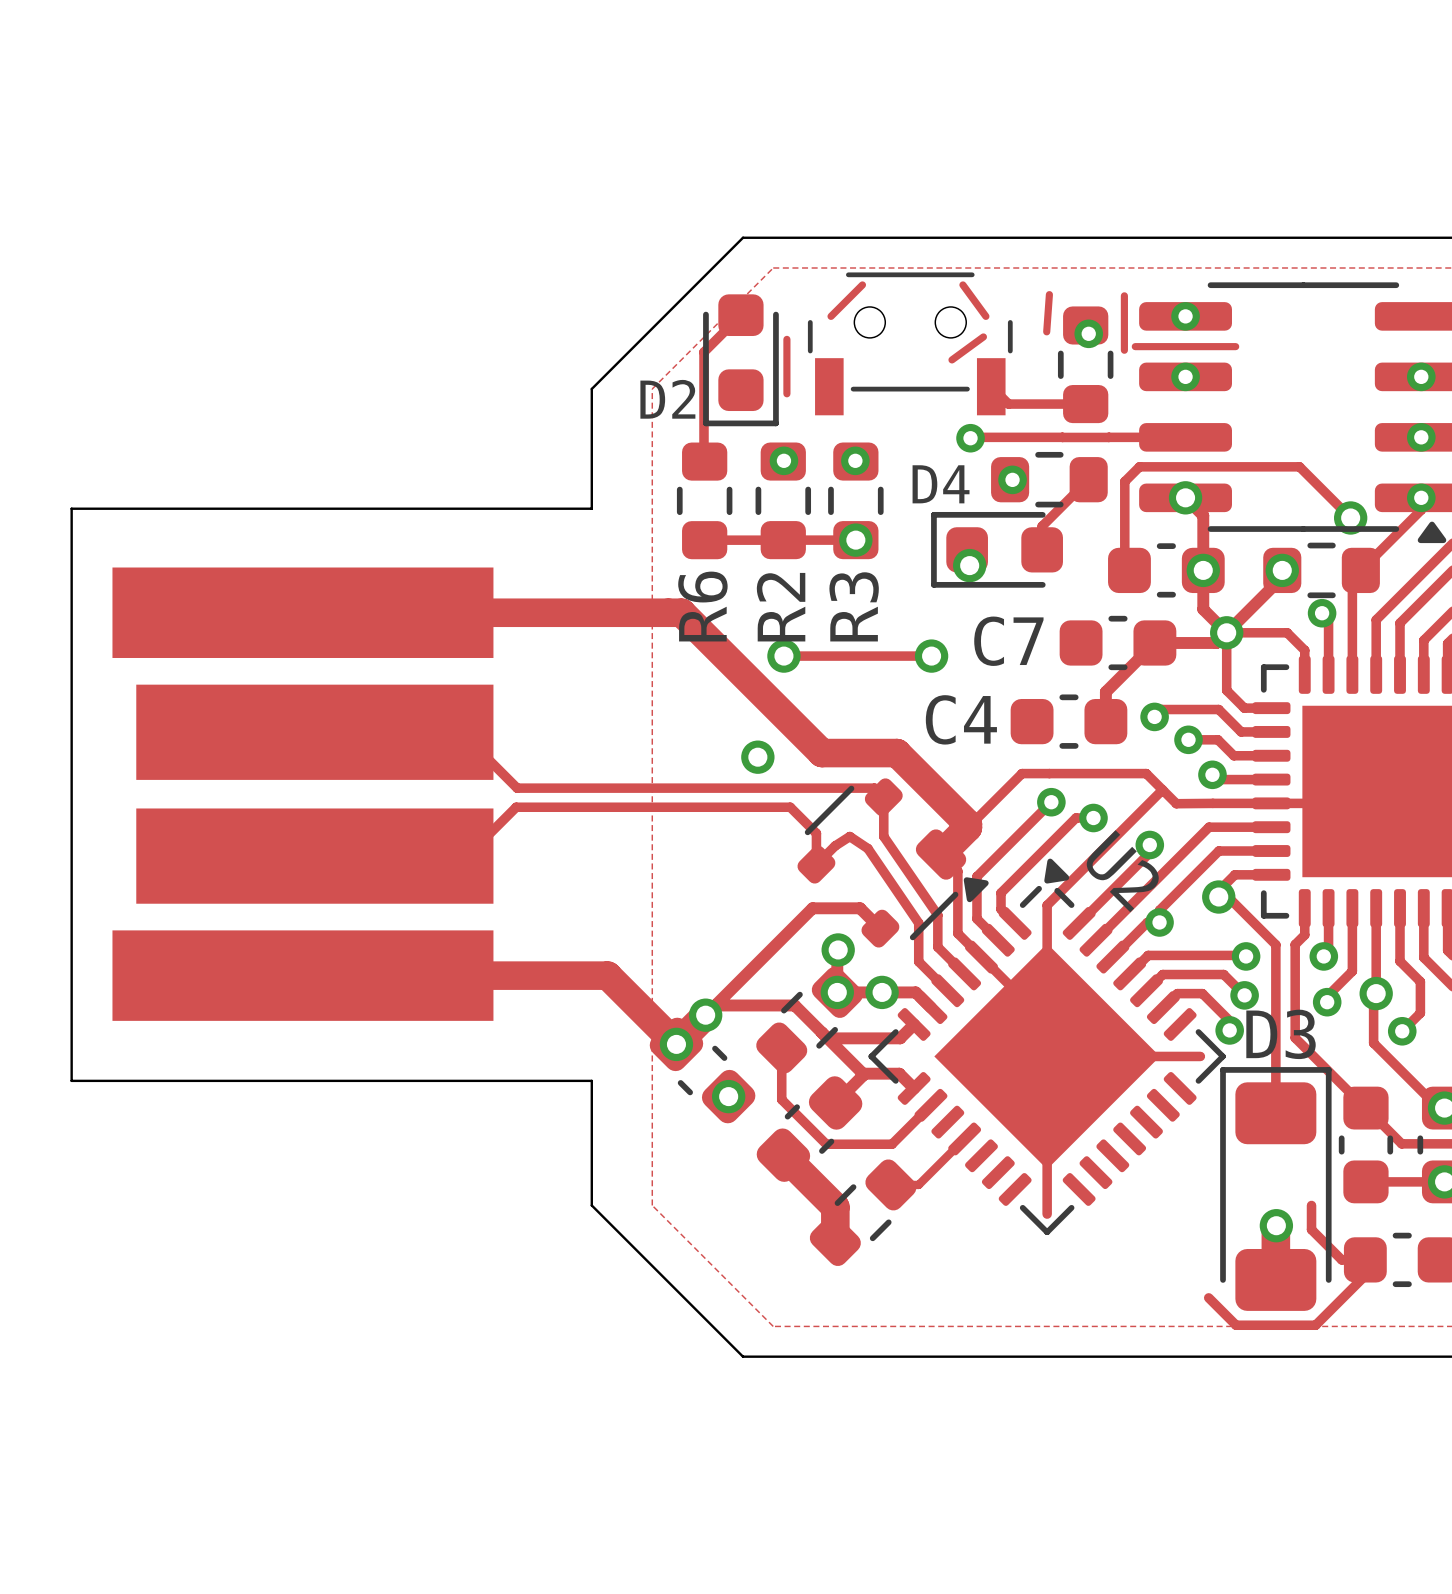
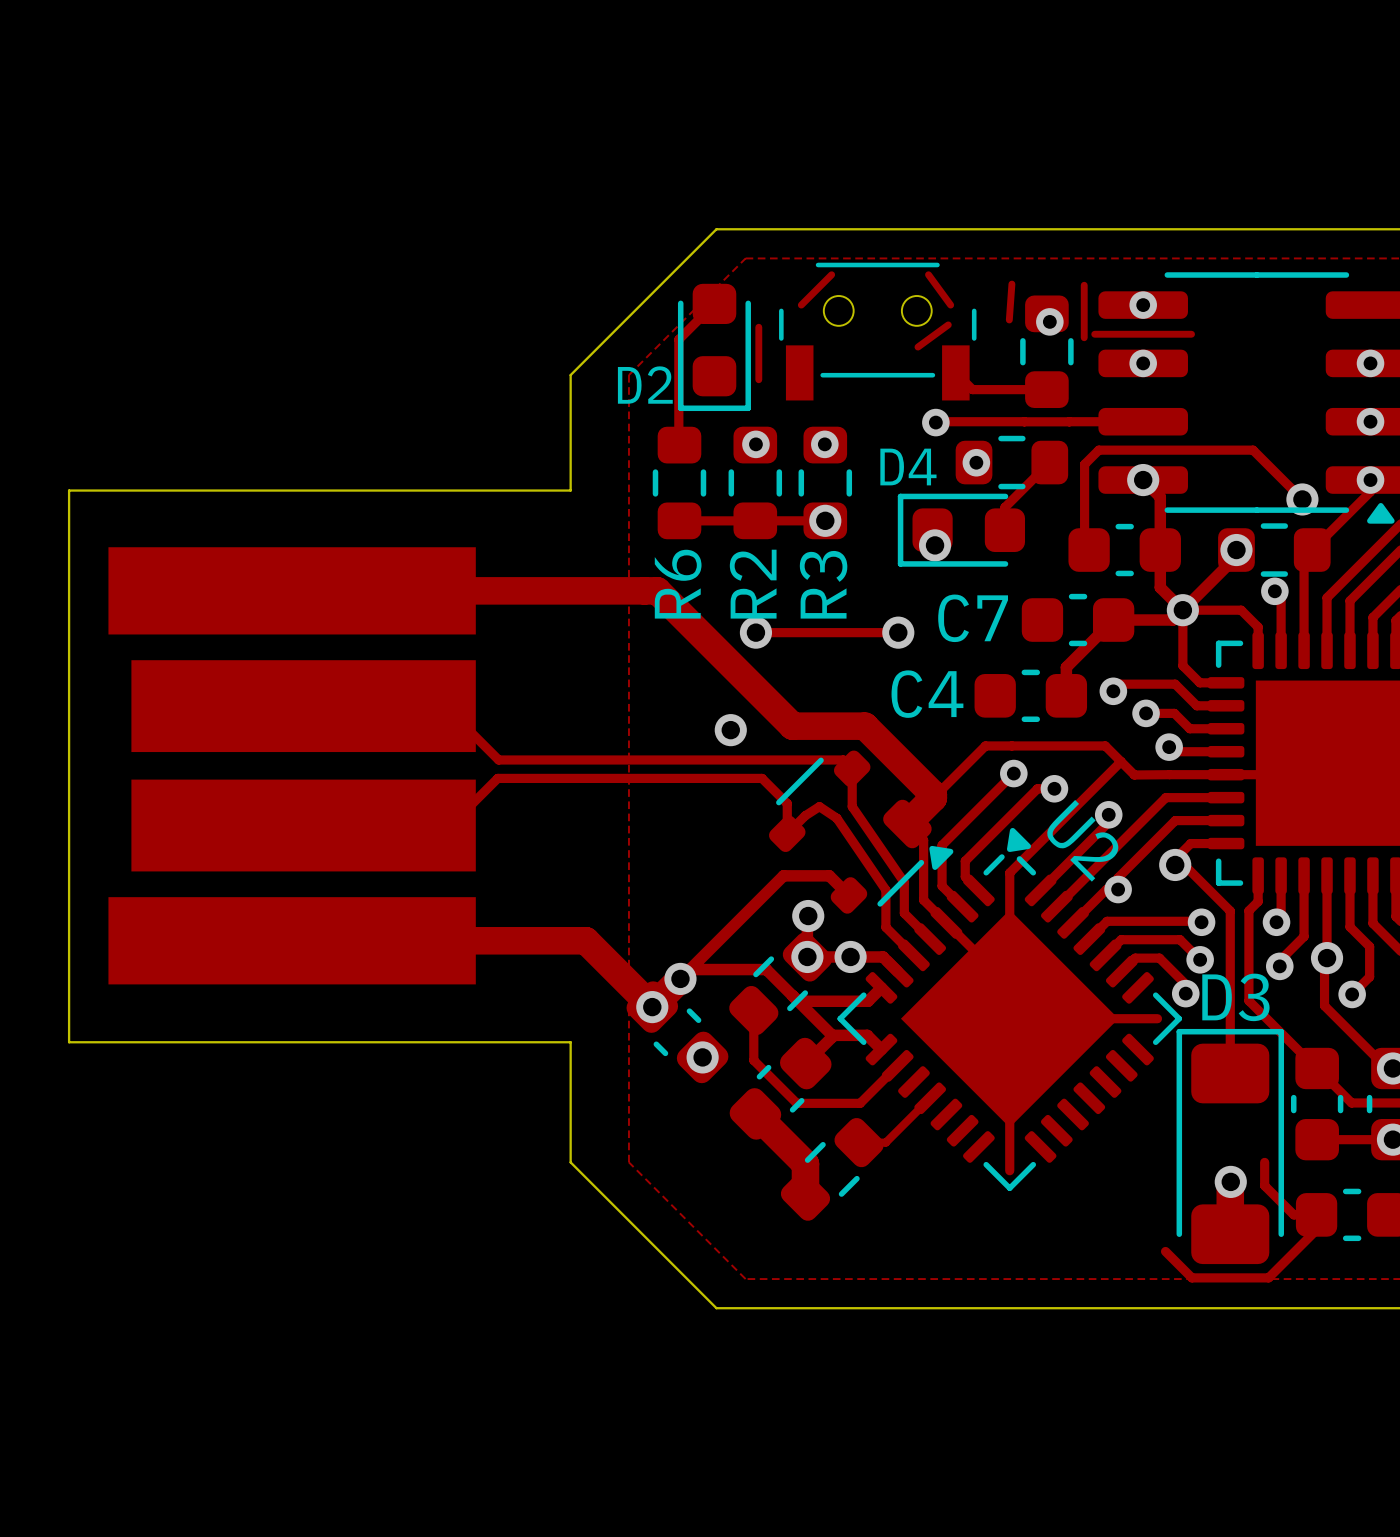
via: (1203, 570) -> none

